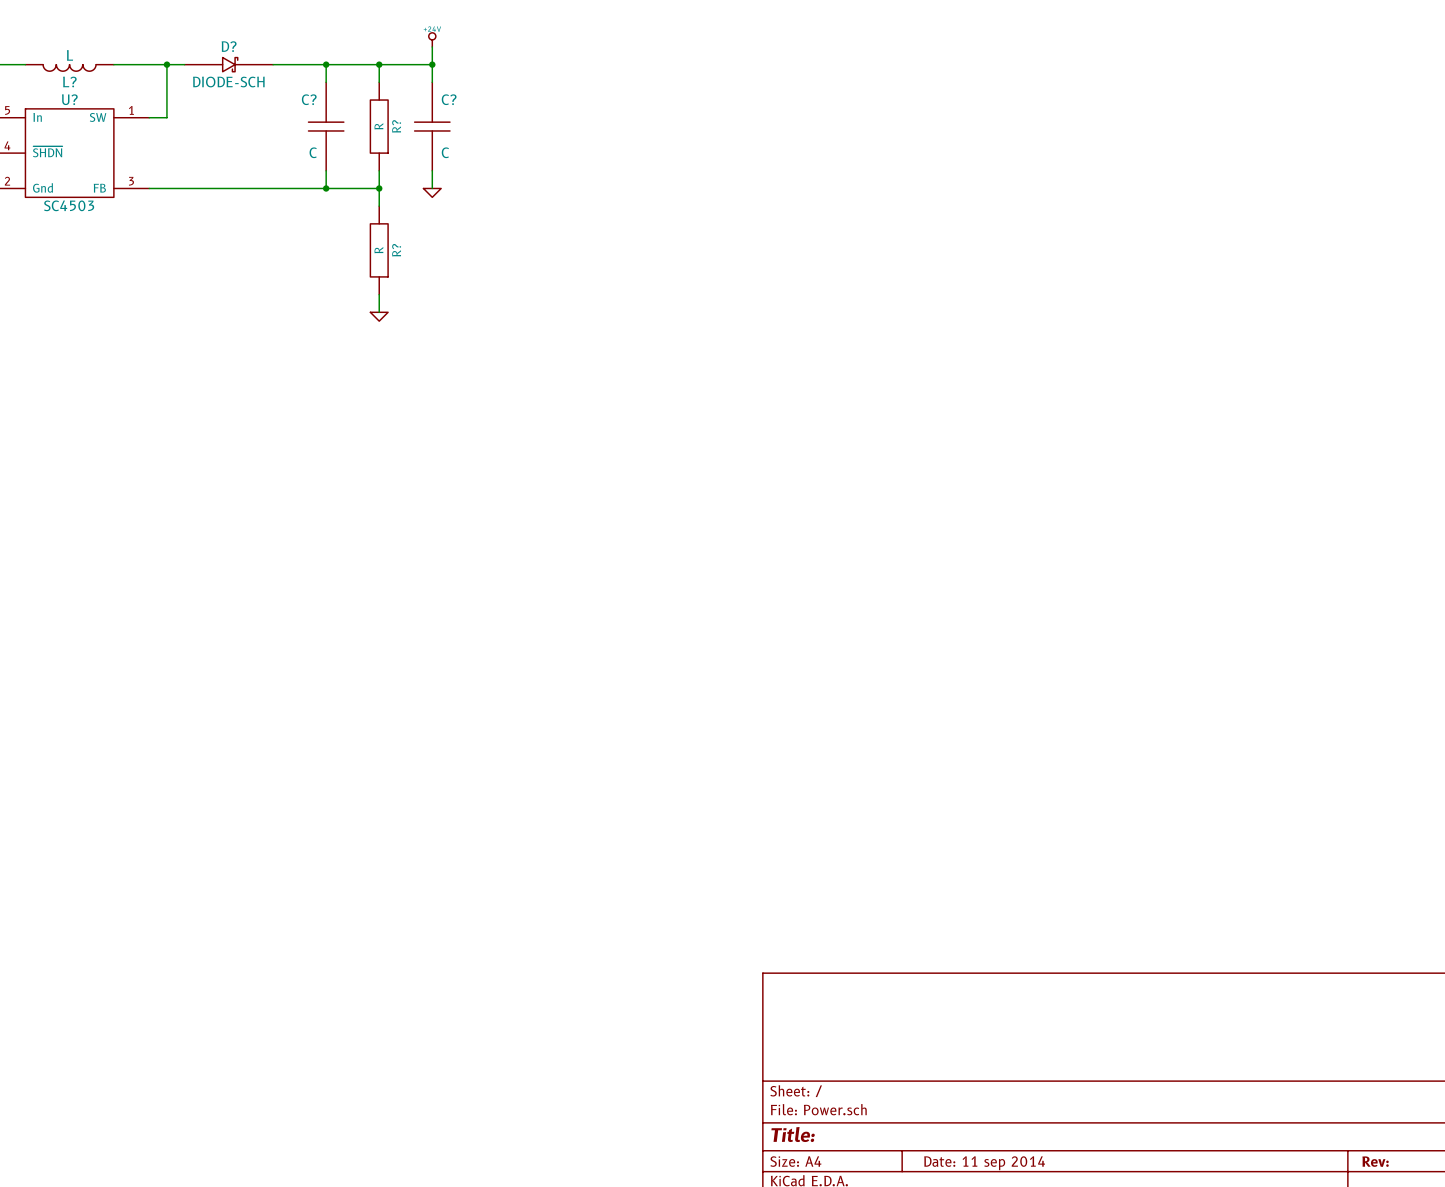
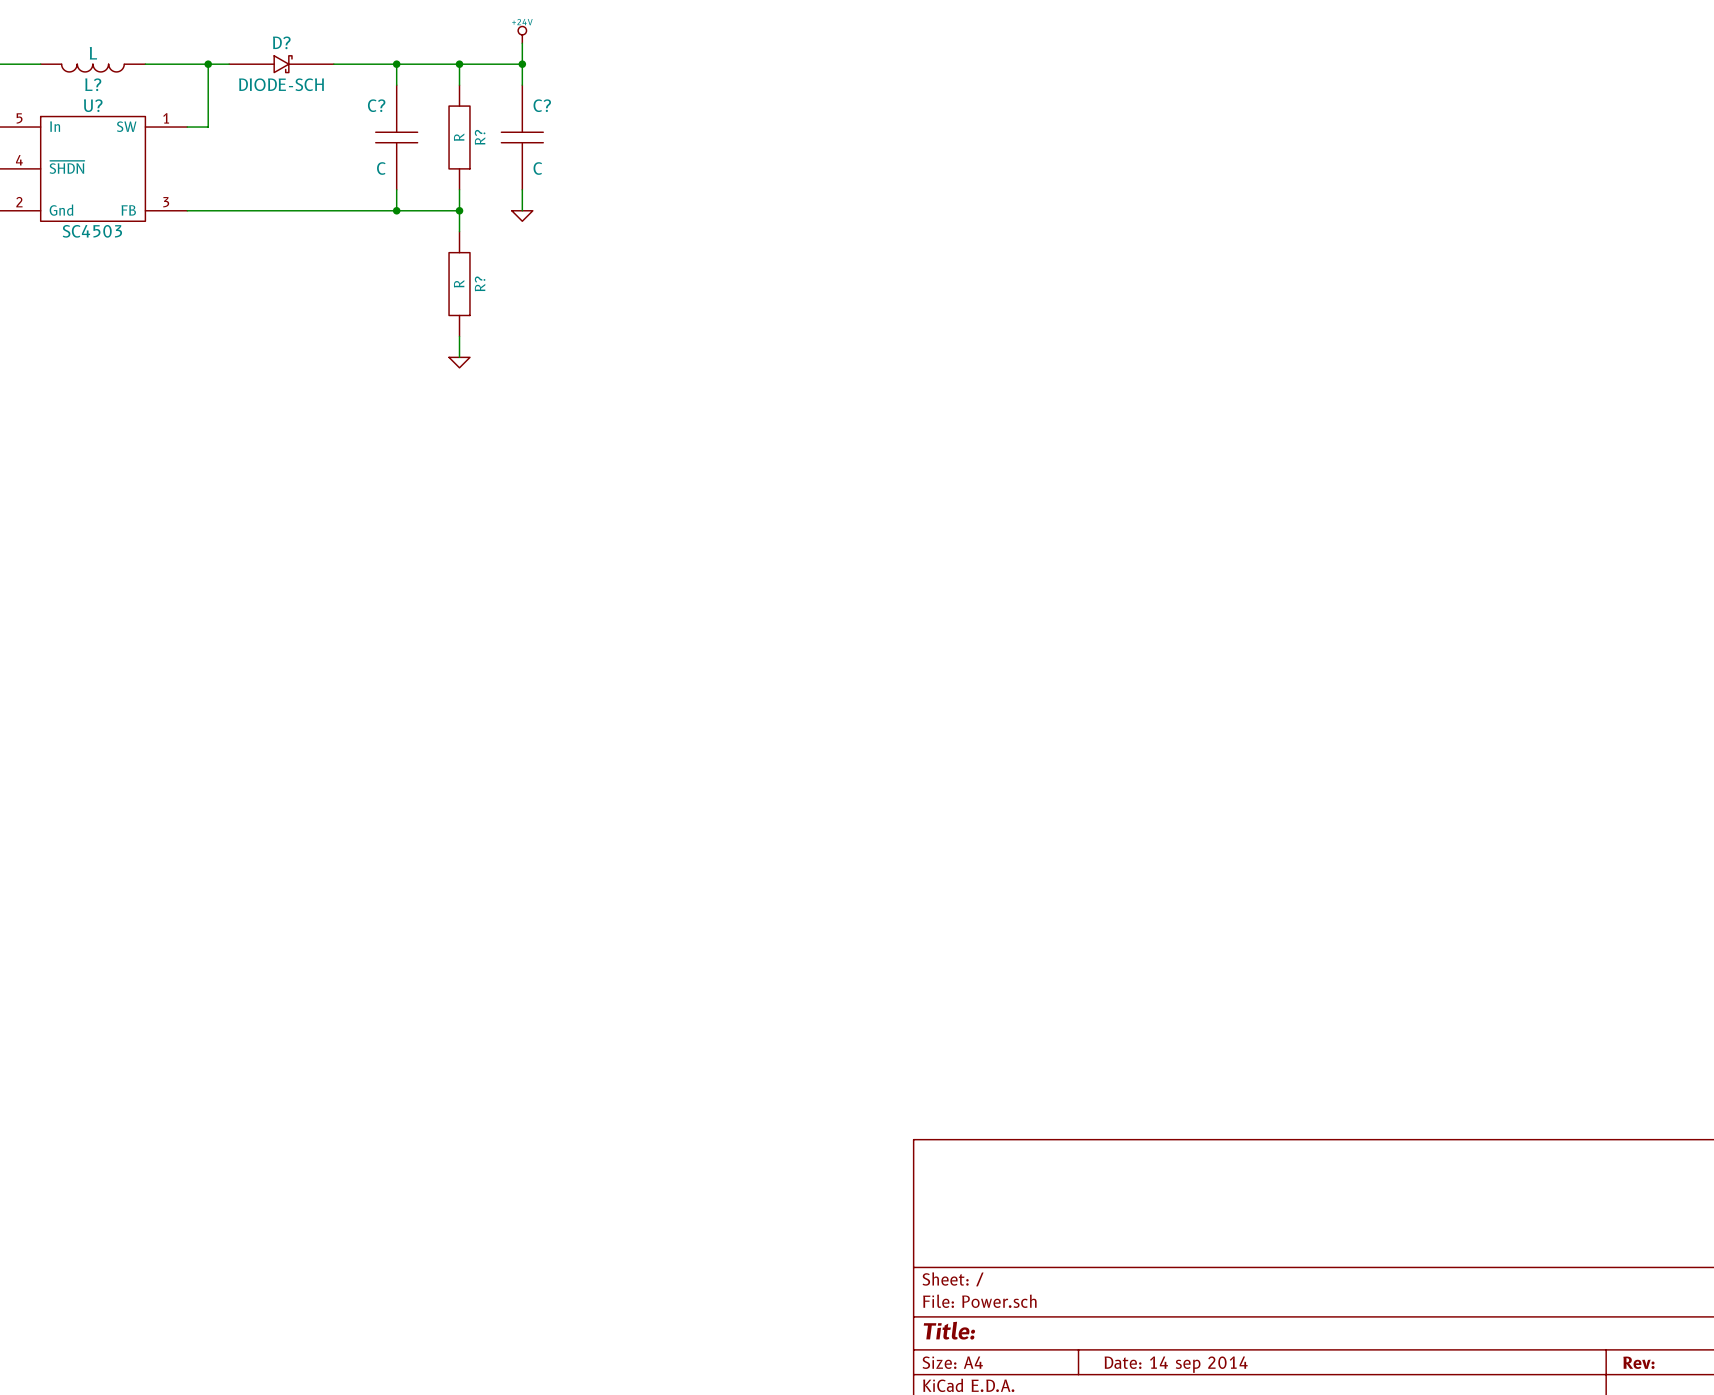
title block: Date: 11 sep 2014 (984, 1163) -> Date: 14 sep 2014 (1176, 1364)

